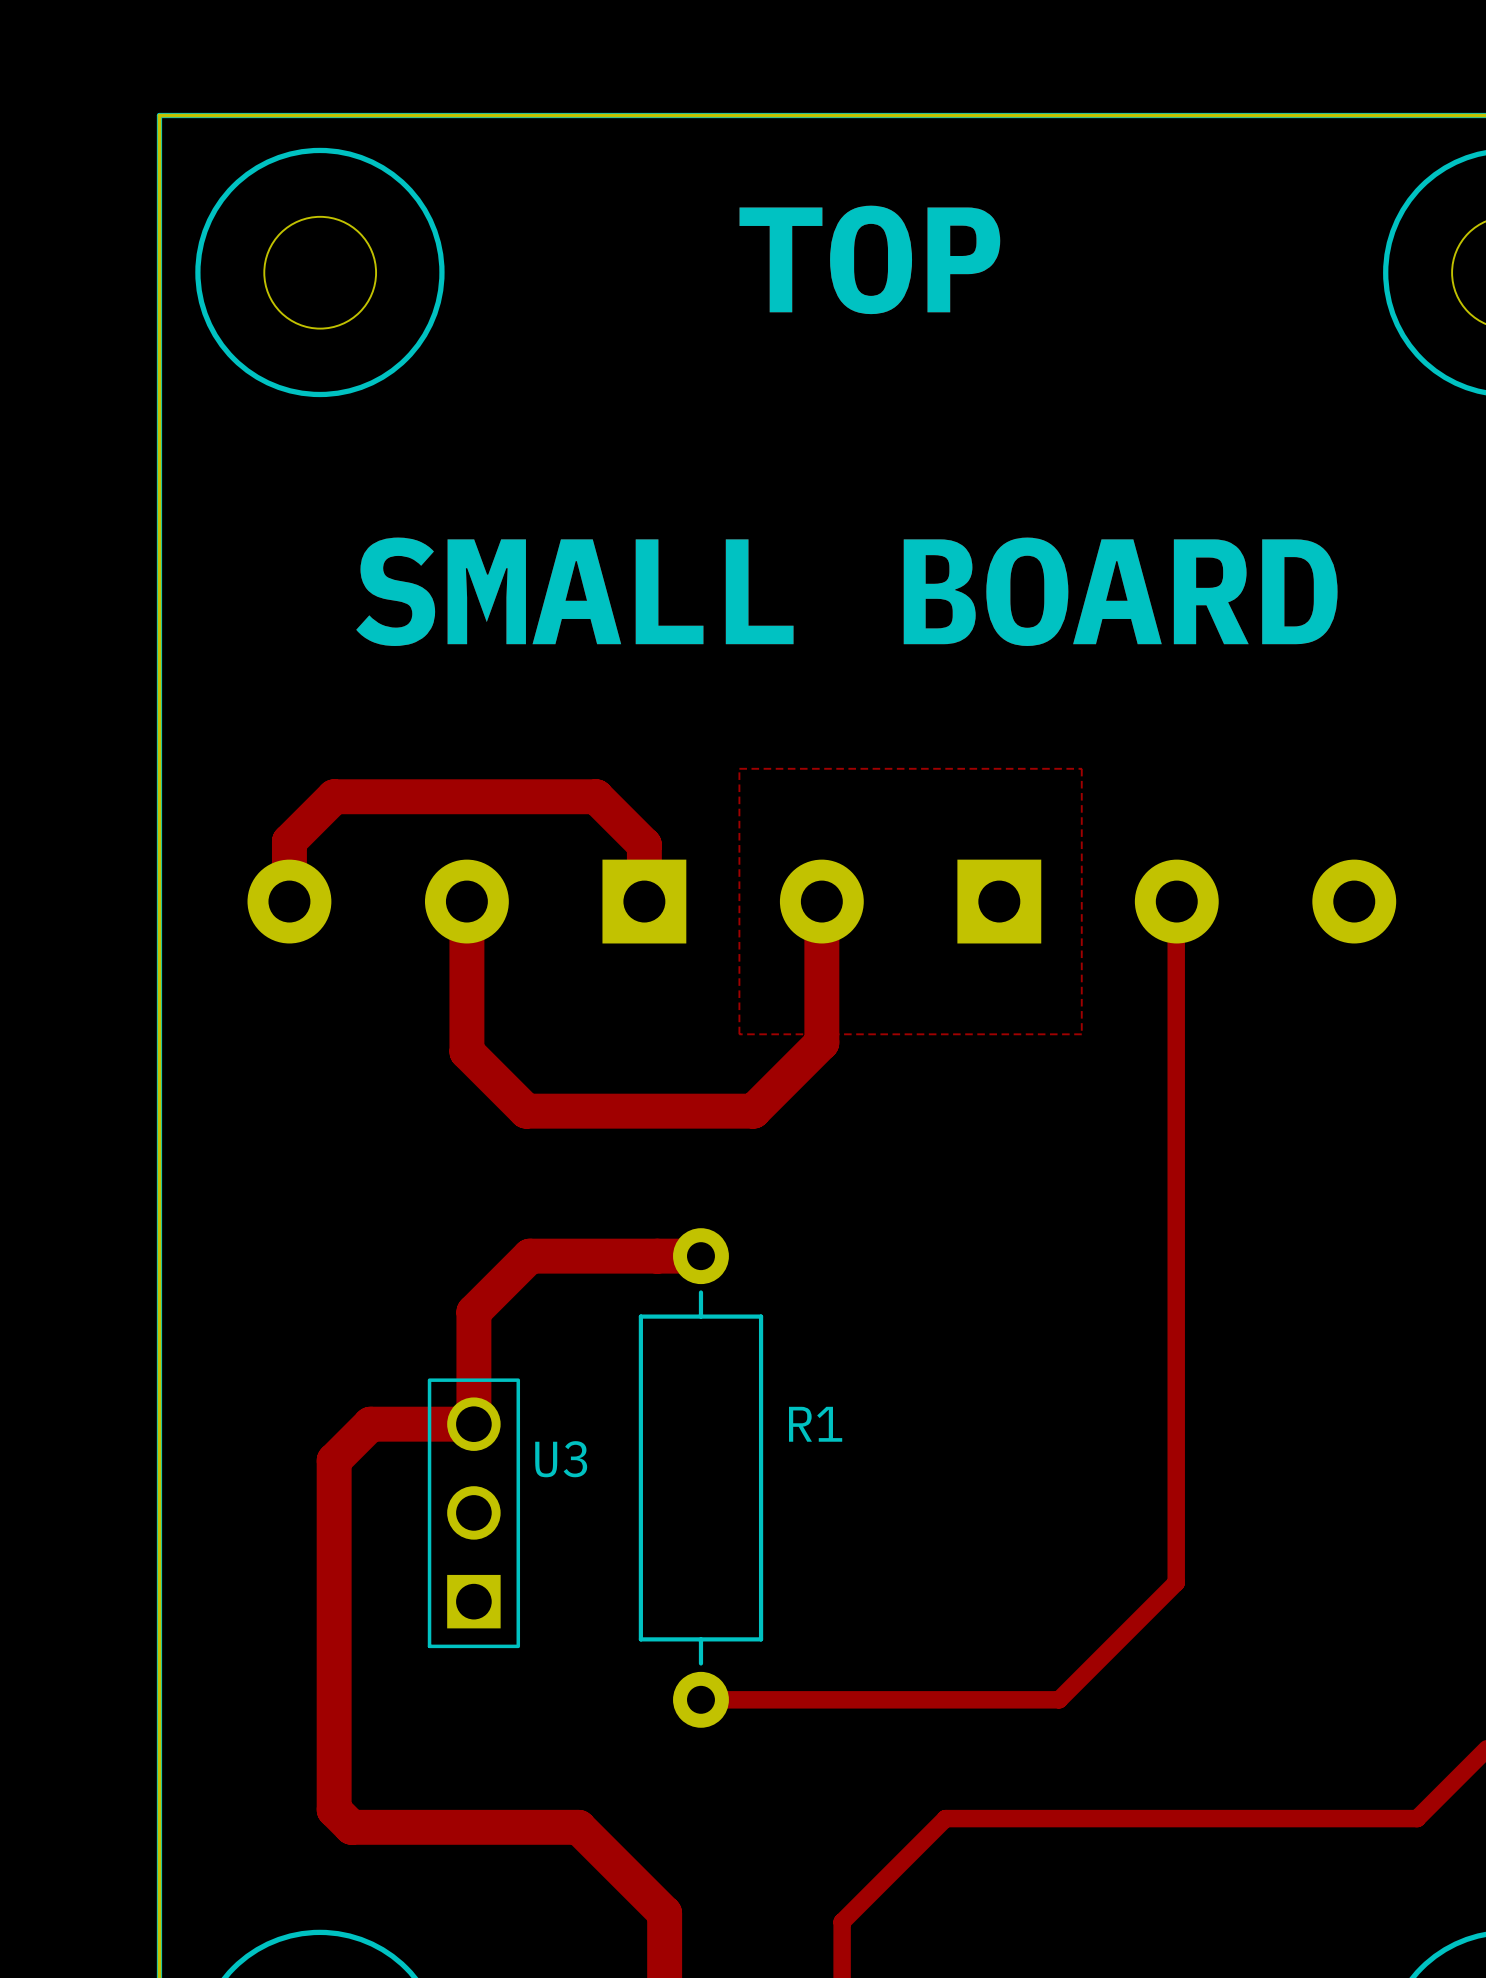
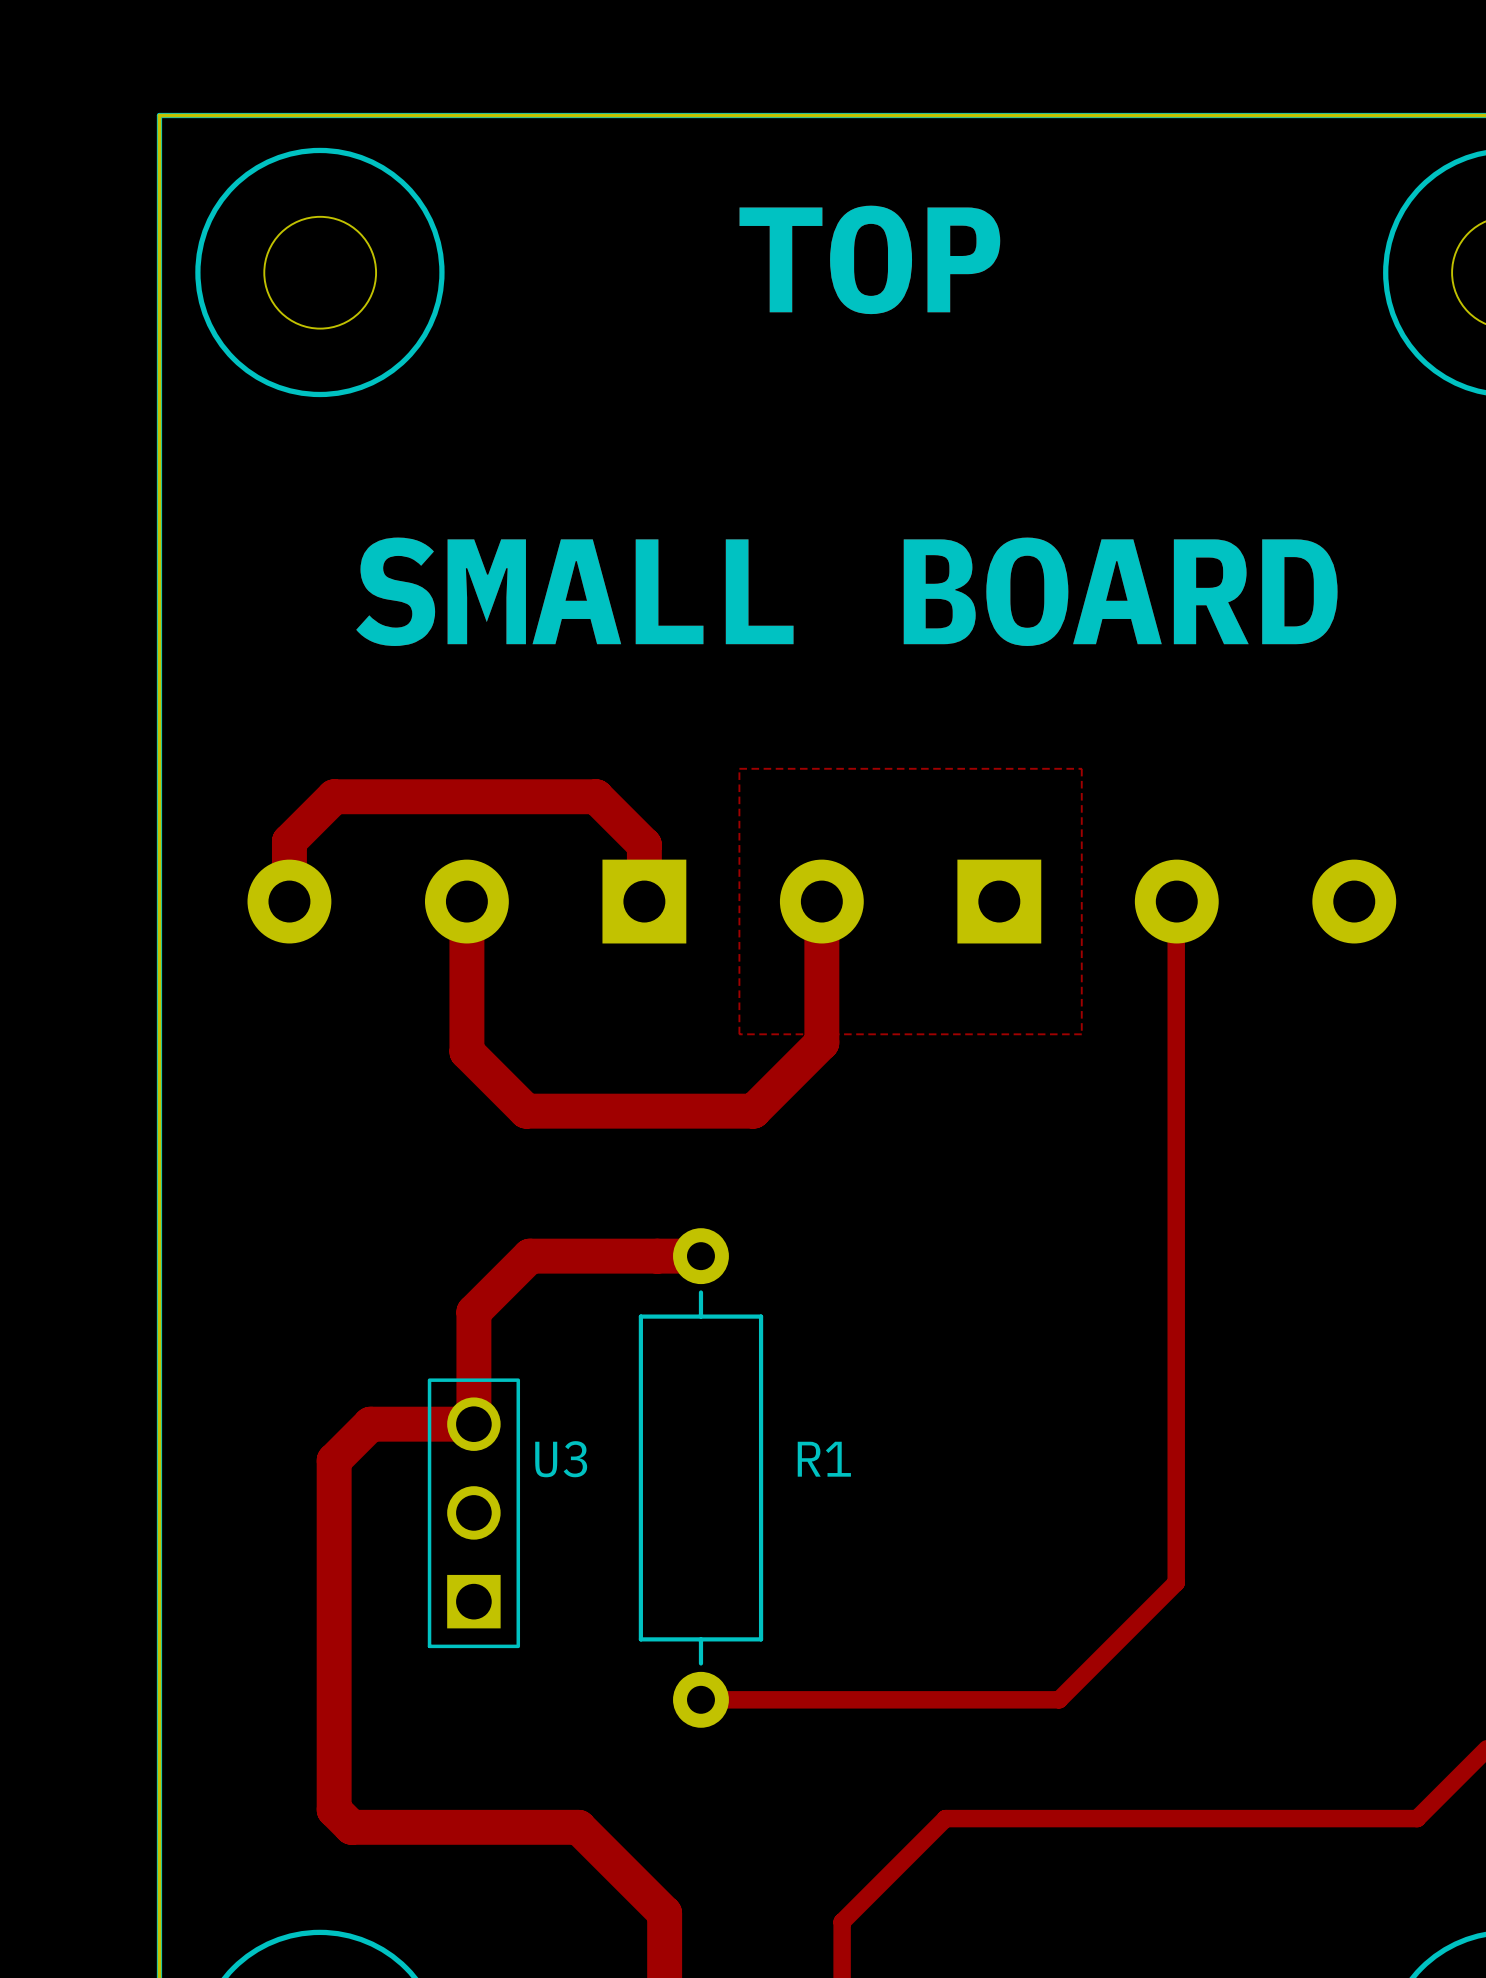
R1 name position: R1 (815, 1424) -> R1 (824, 1459)

